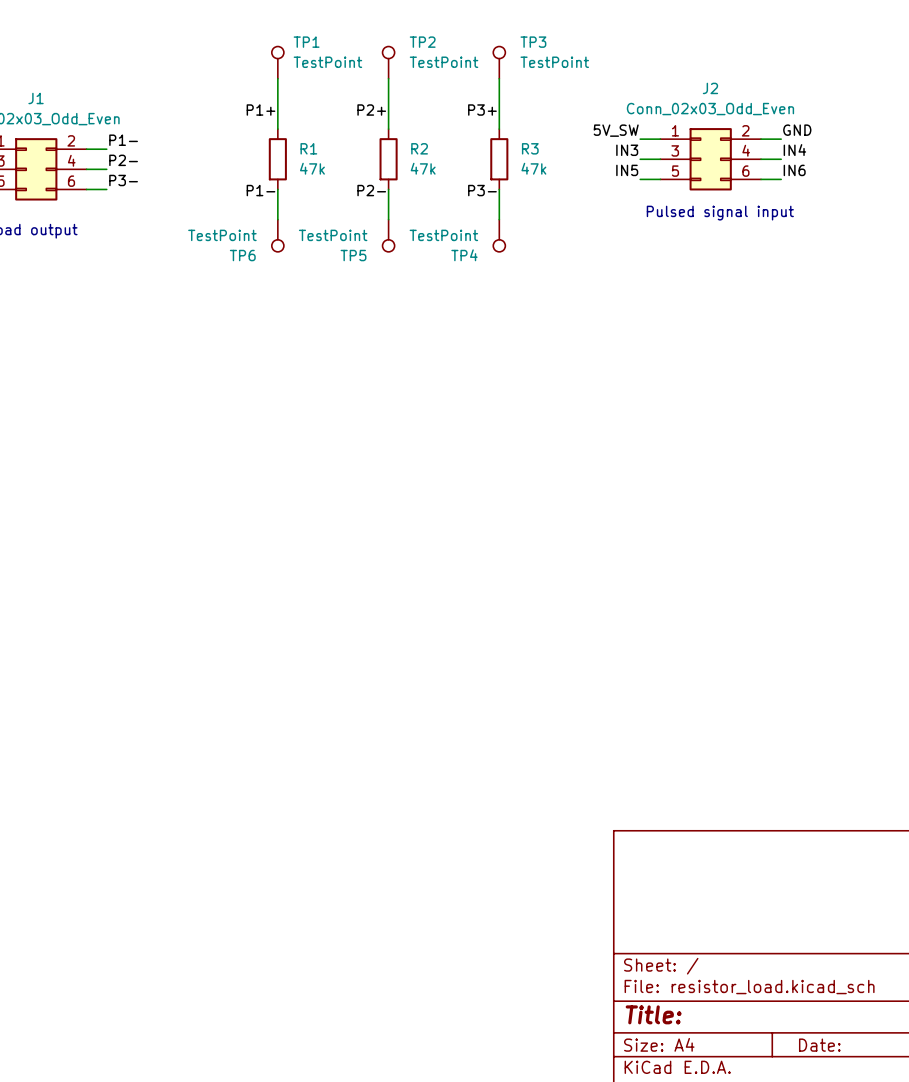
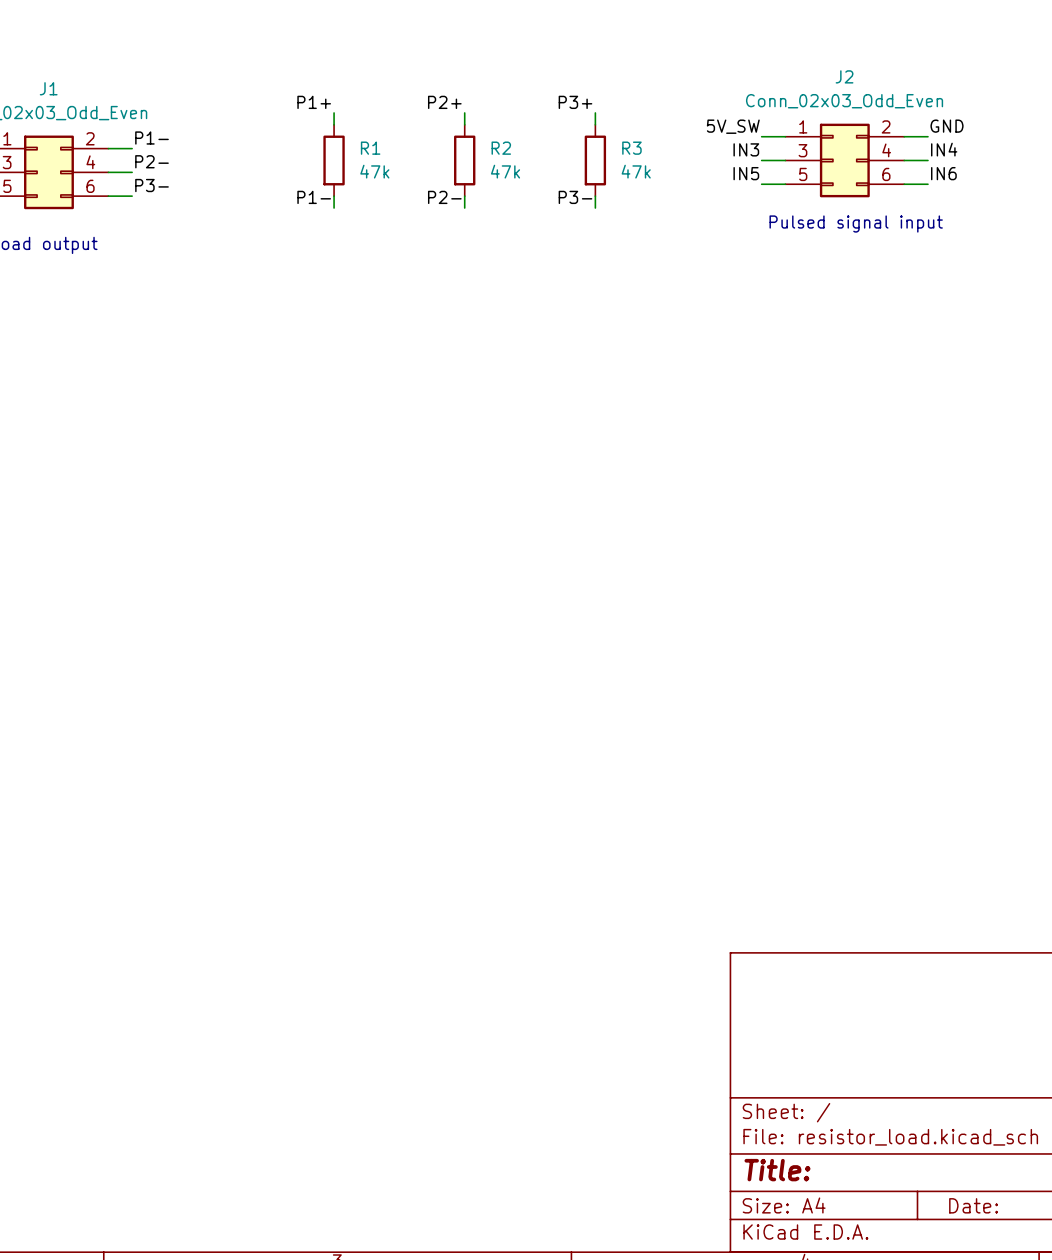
TP1: TestPoint (277, 62) -> none
TP2: TestPoint (388, 62) -> none
TP3: TestPoint (499, 62) -> none
wire: (277, 78) (277, 119) -> none
wire: (388, 78) (388, 119) -> none
wire: (499, 78) (499, 119) -> none
wire: (277, 199) (277, 219) -> none
wire: (388, 199) (388, 219) -> none
wire: (499, 199) (499, 219) -> none
TP6: TestPoint (277, 235) -> none
TP5: TestPoint (388, 235) -> none
TP4: TestPoint (499, 235) -> none

